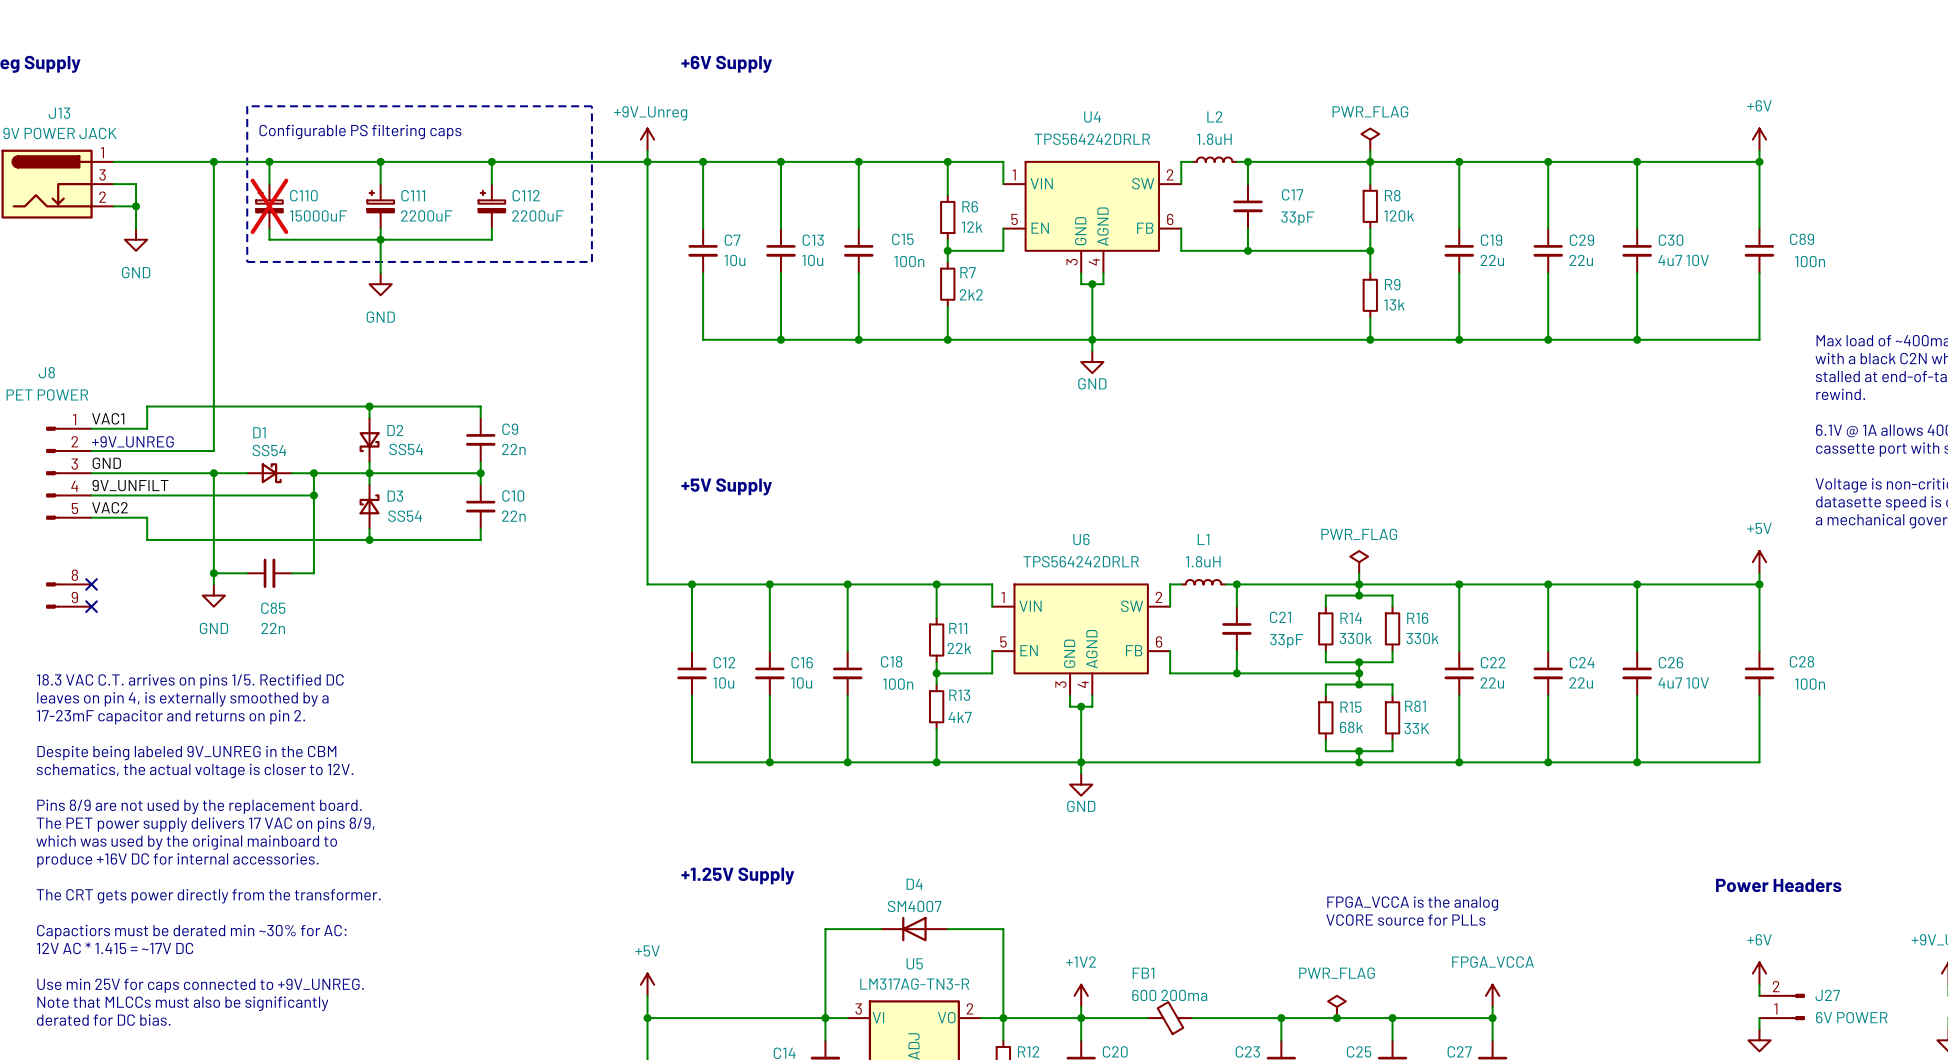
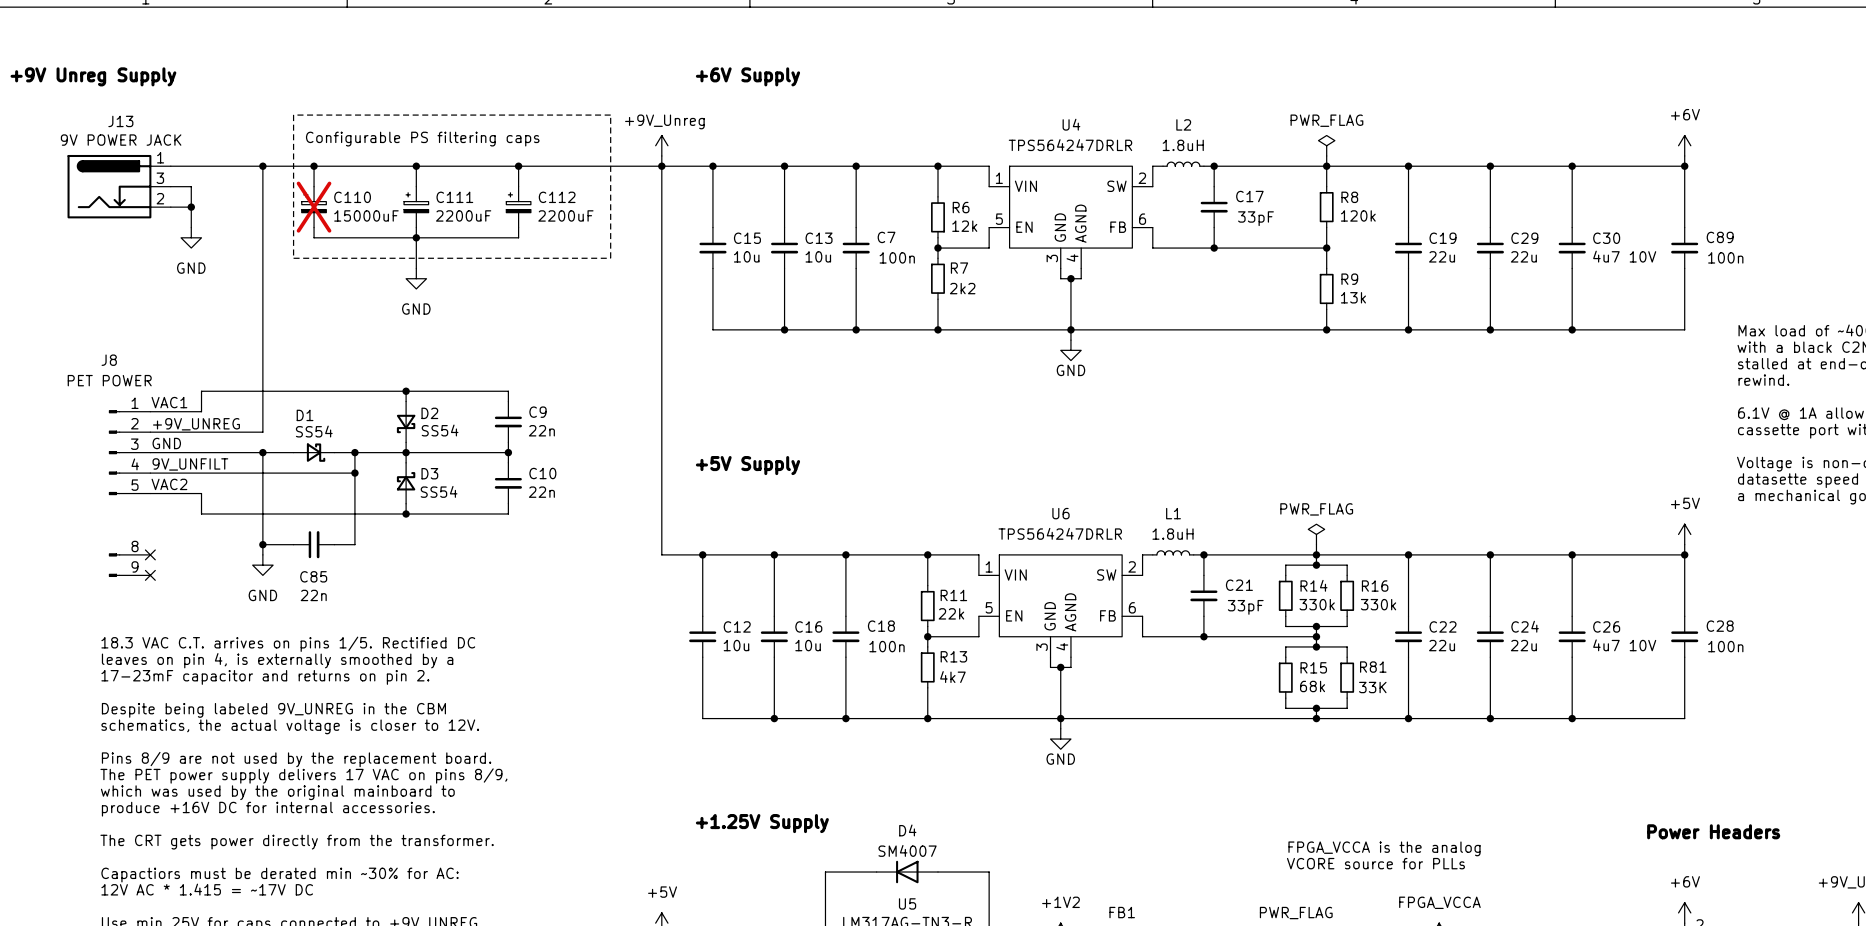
U4 value: TPS564242DRLR (1092, 139) -> TPS564247DRLR (1070, 145)
C15 name: C15 (902, 239) -> C7 (886, 237)
C7 name: C7 (732, 240) -> C15 (747, 238)
U6 value: TPS564242DRLR (1081, 561) -> TPS564247DRLR (1060, 533)

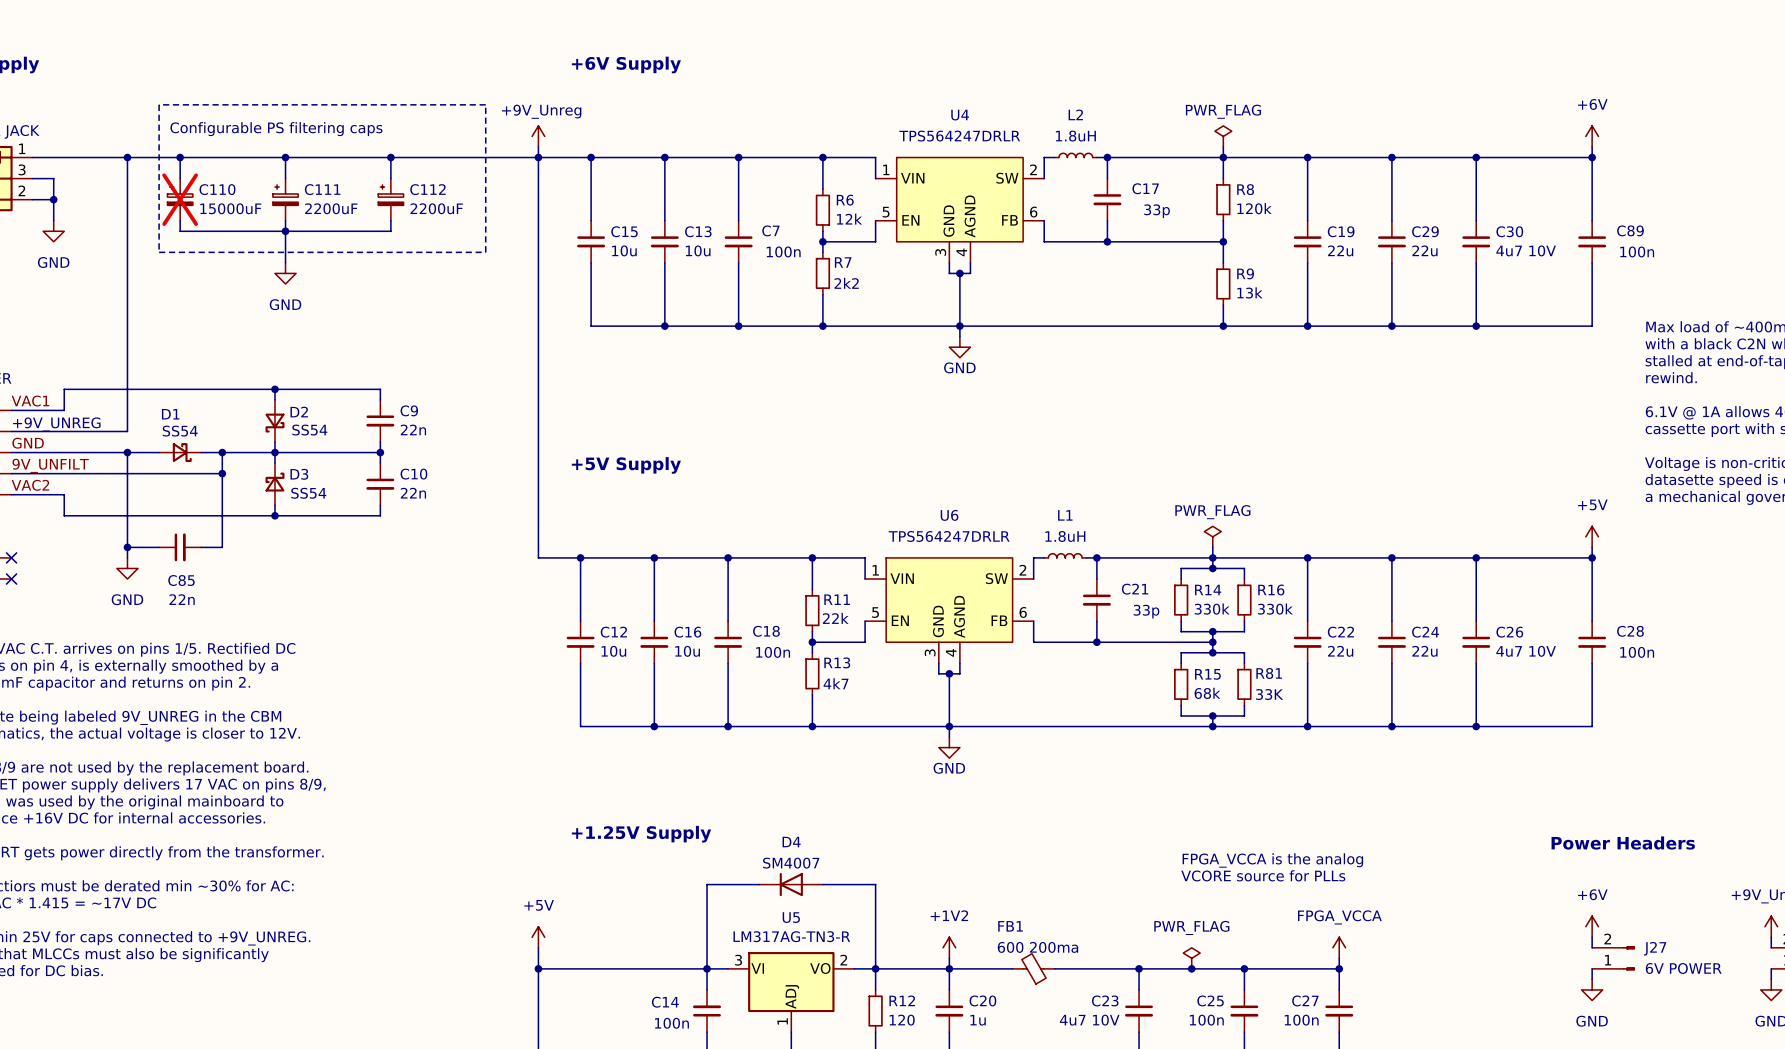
C17 value: 33pF (1255, 218) -> 33p (1157, 211)
C21 value: 33pF (1245, 607) -> 33p (1146, 611)

